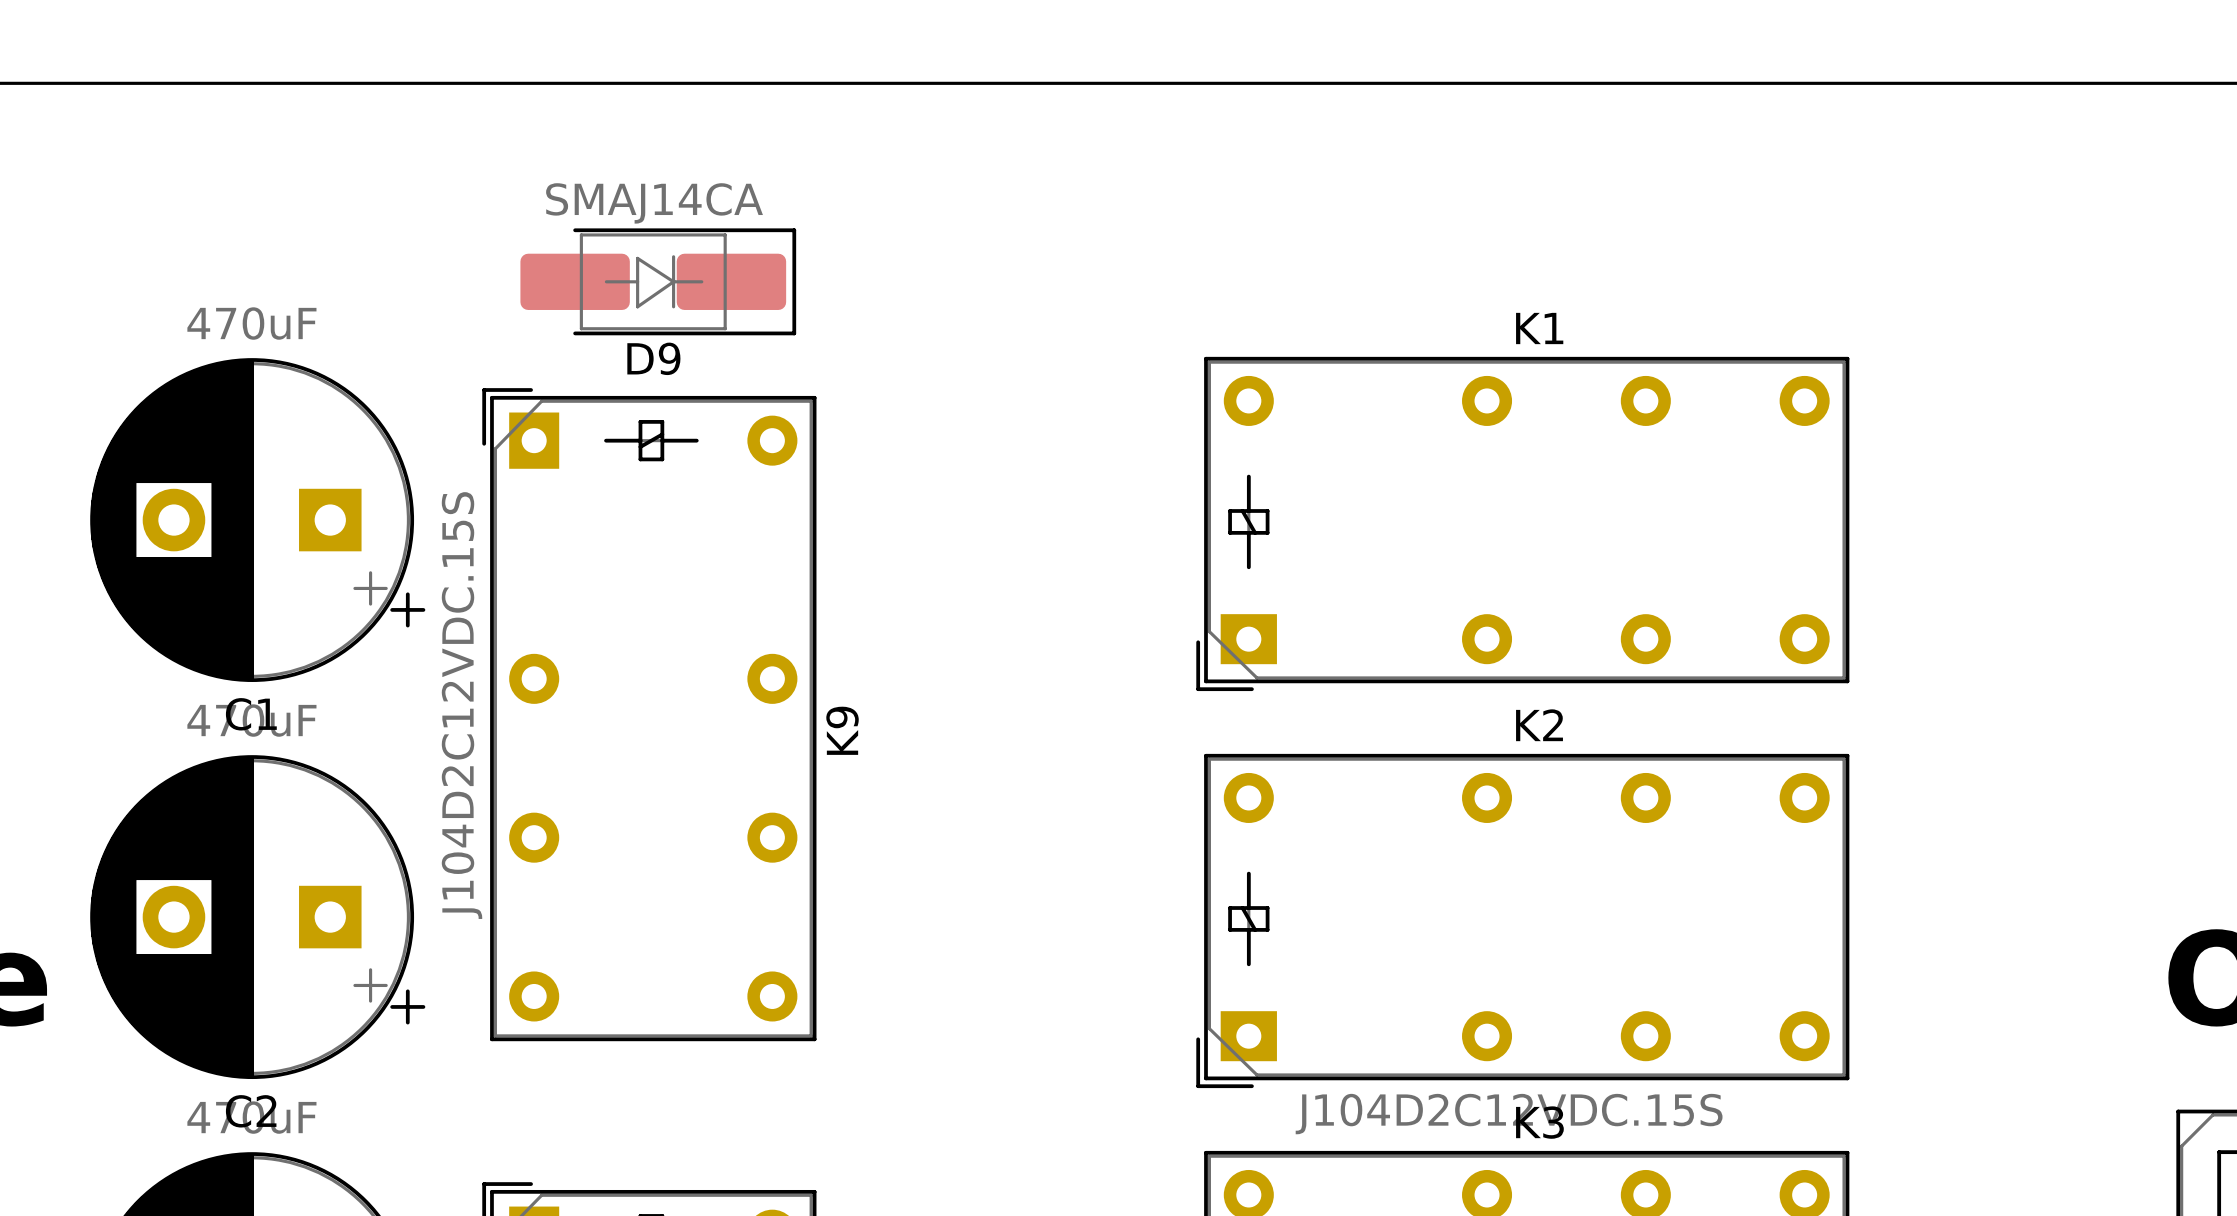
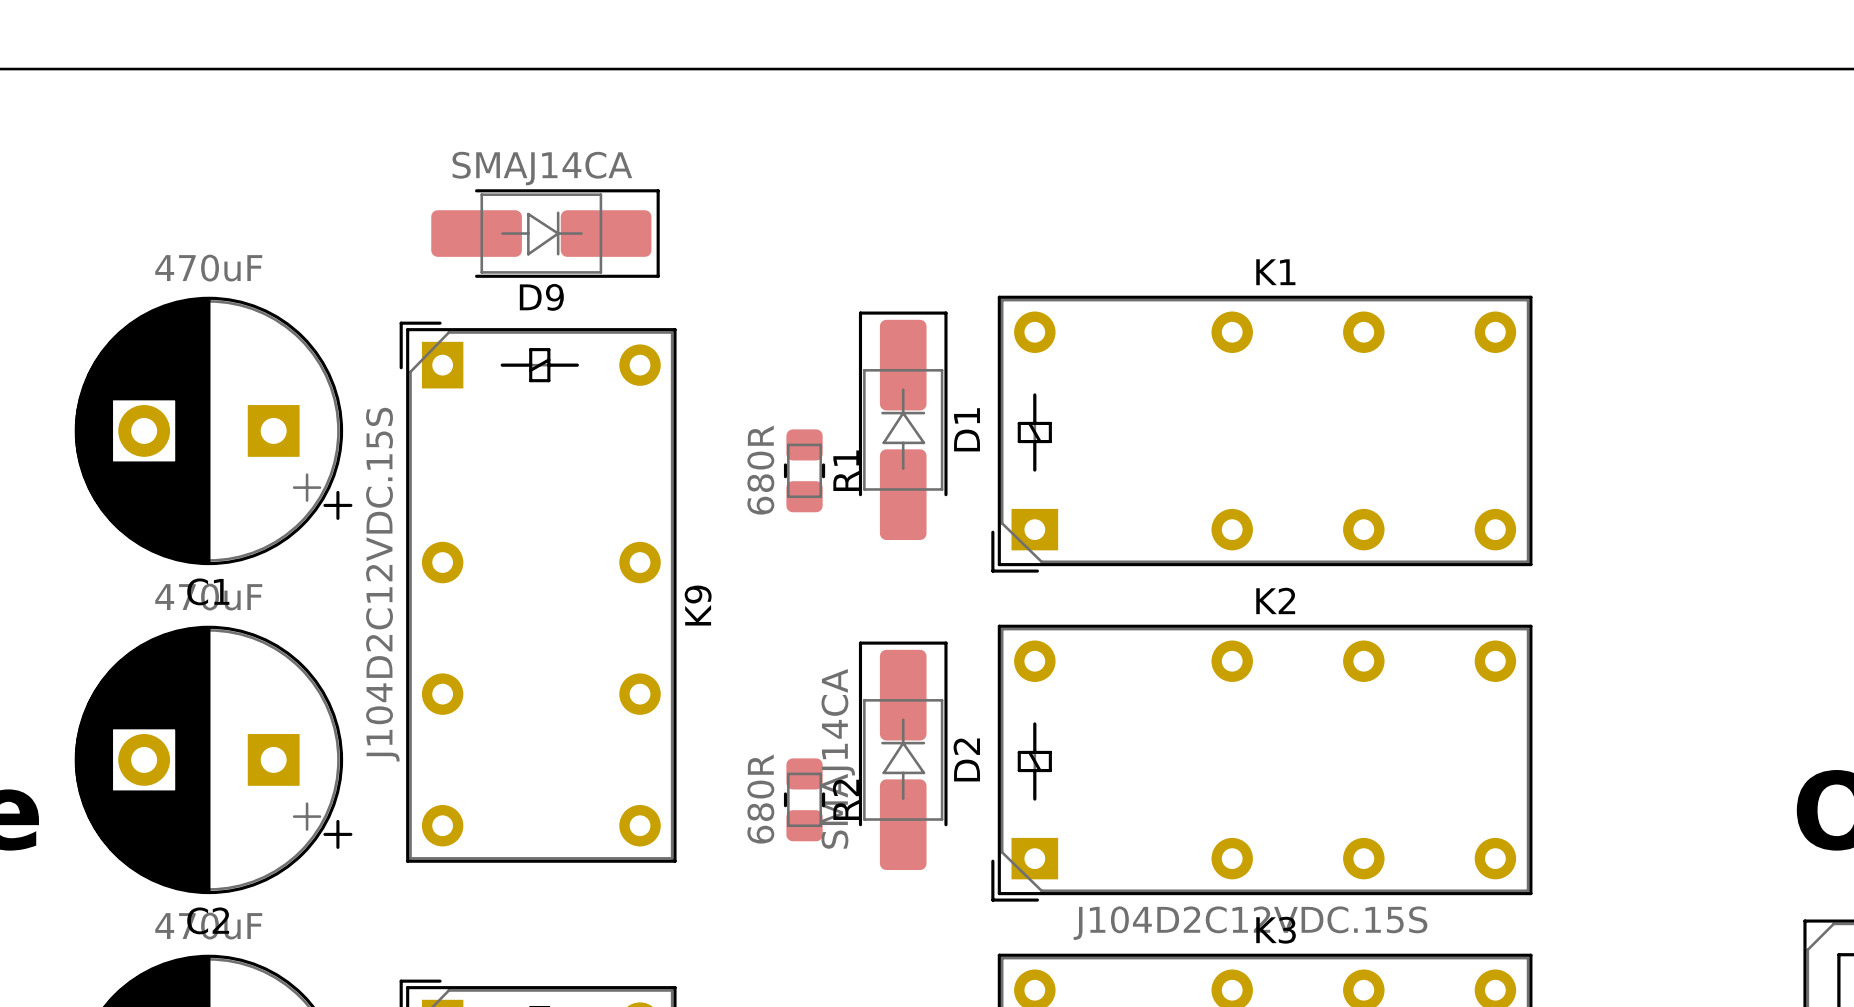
D1: none -> (903, 425)
R1: none -> 680R (804, 470)
D2: none -> SMAJ14CA (903, 755)
R2: none -> 680R (804, 799)

